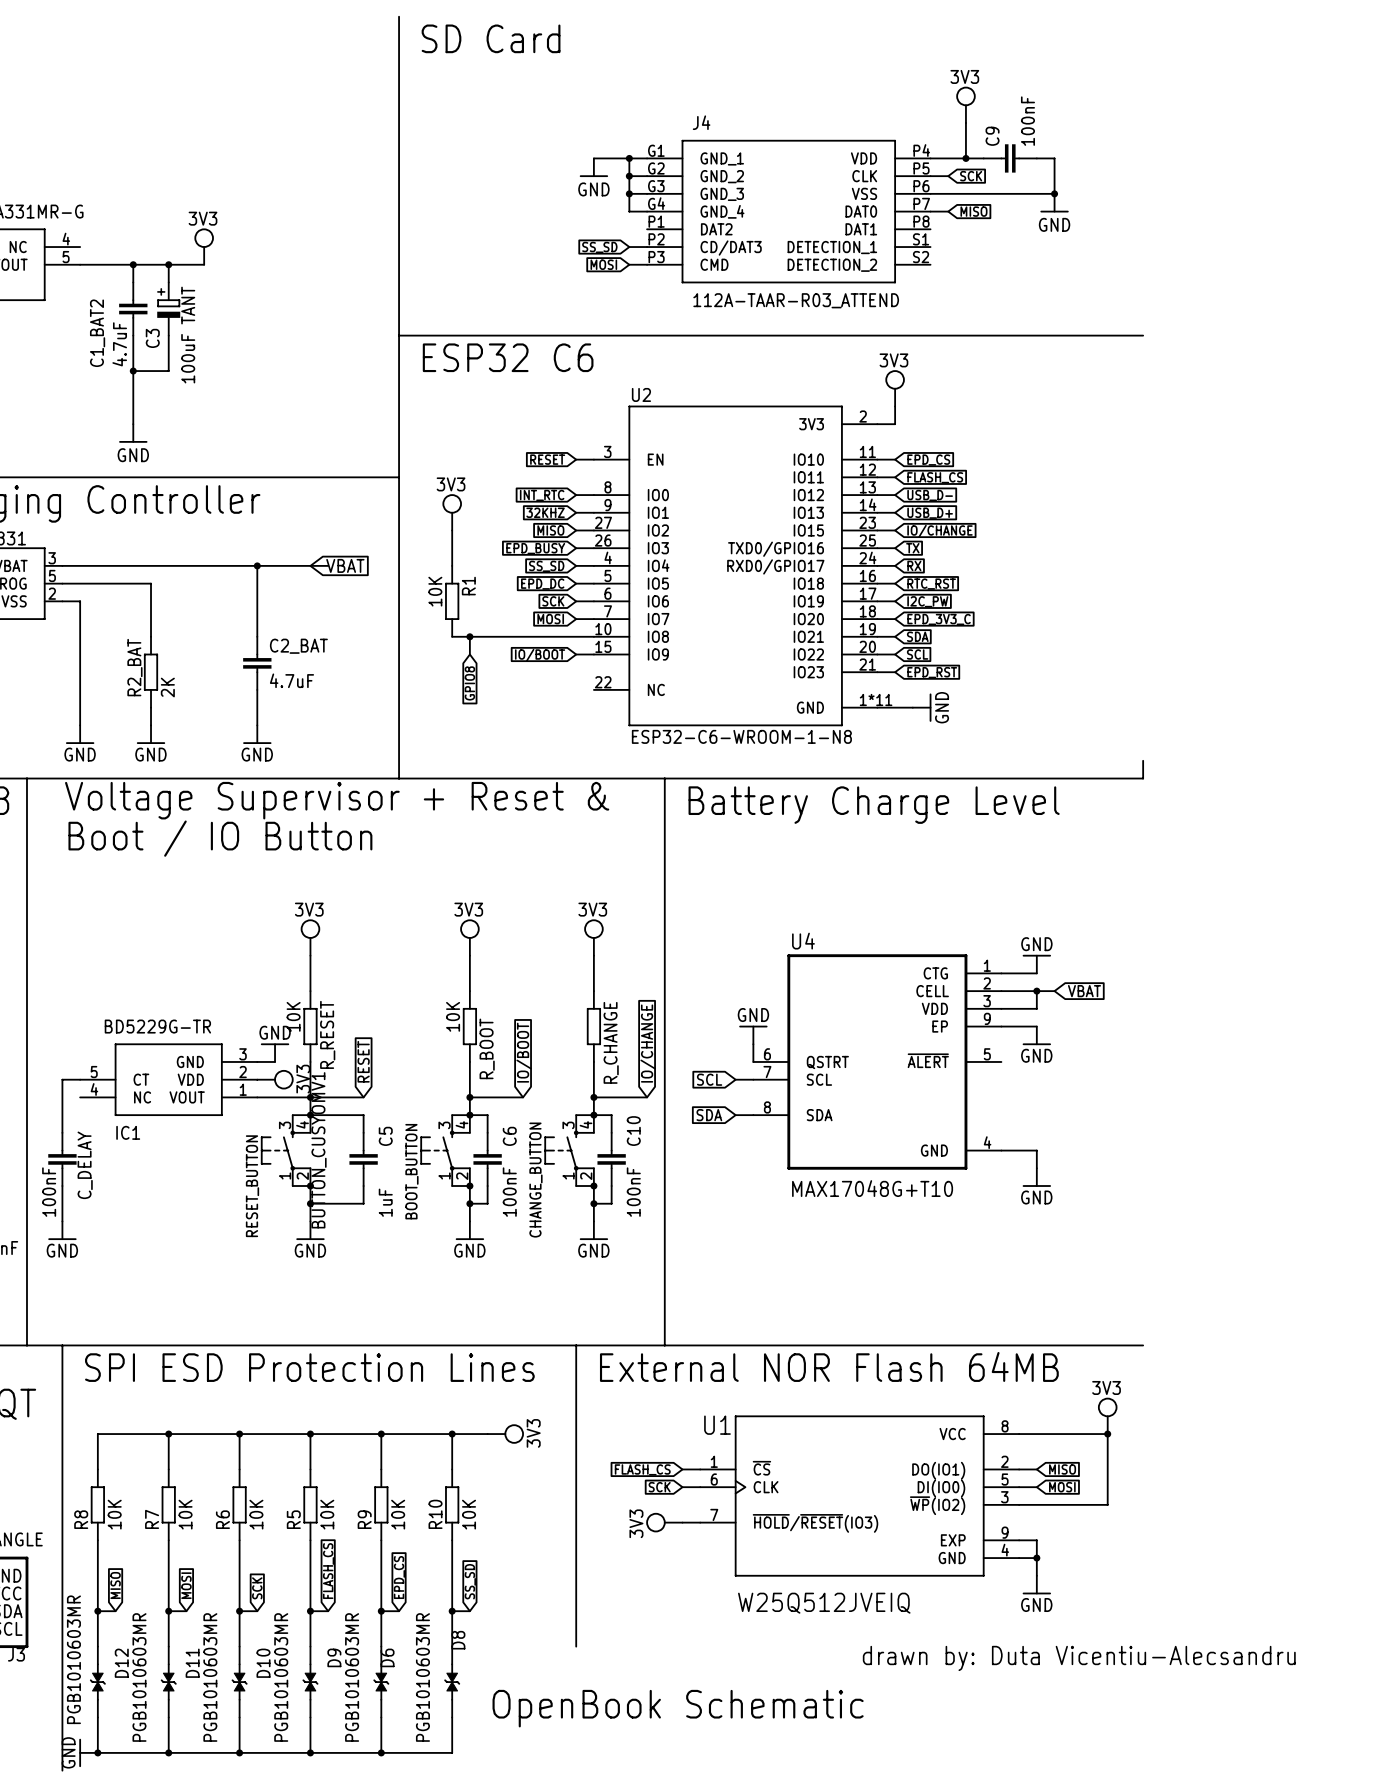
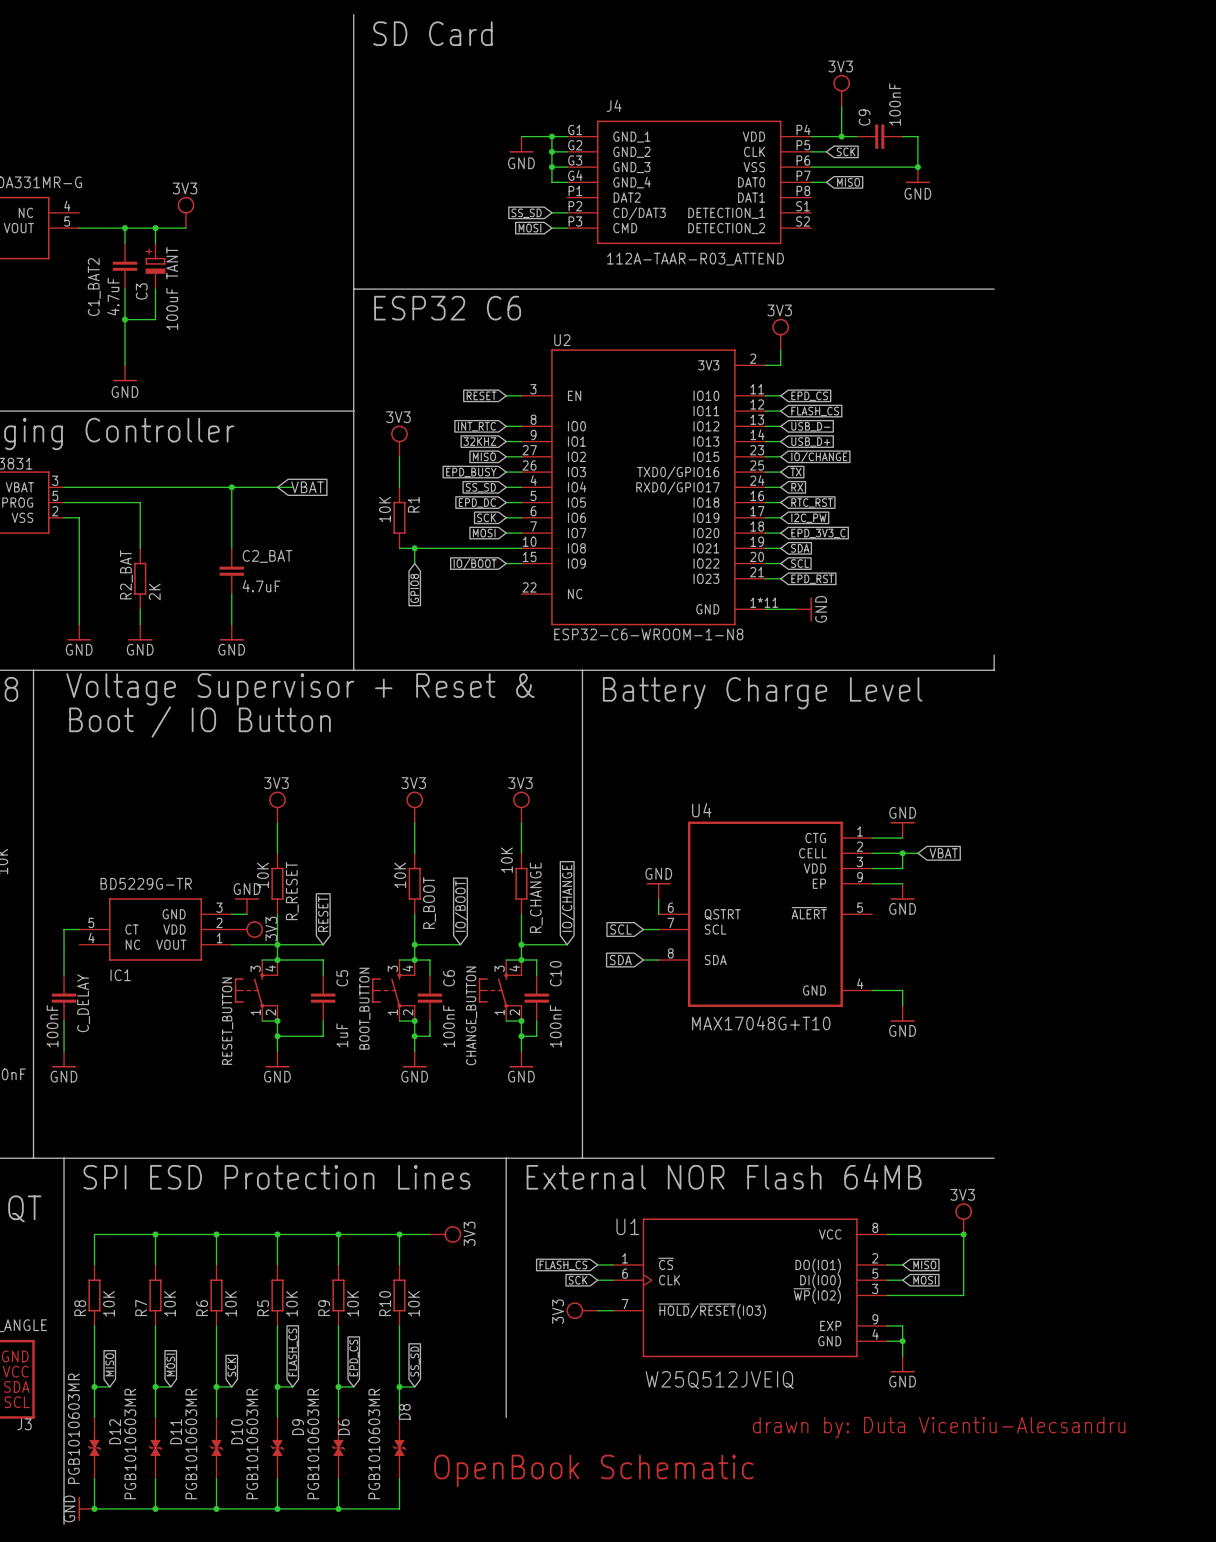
R_CHANGE value: none -> 10K (506, 860)
part value: BUTTON_CUSYOMV1 (319, 1150) -> none

